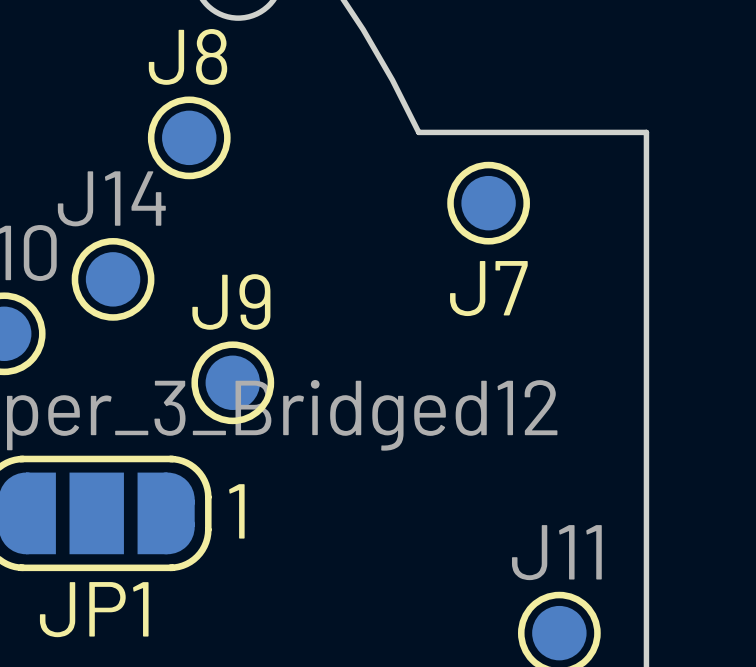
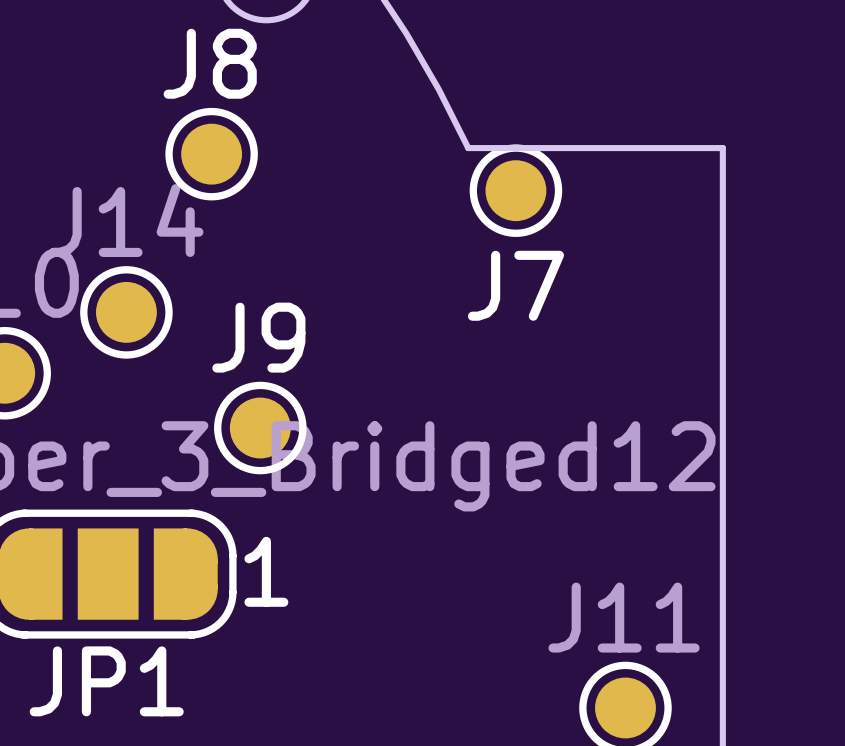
J7 position: (488, 203) -> (515, 190)

